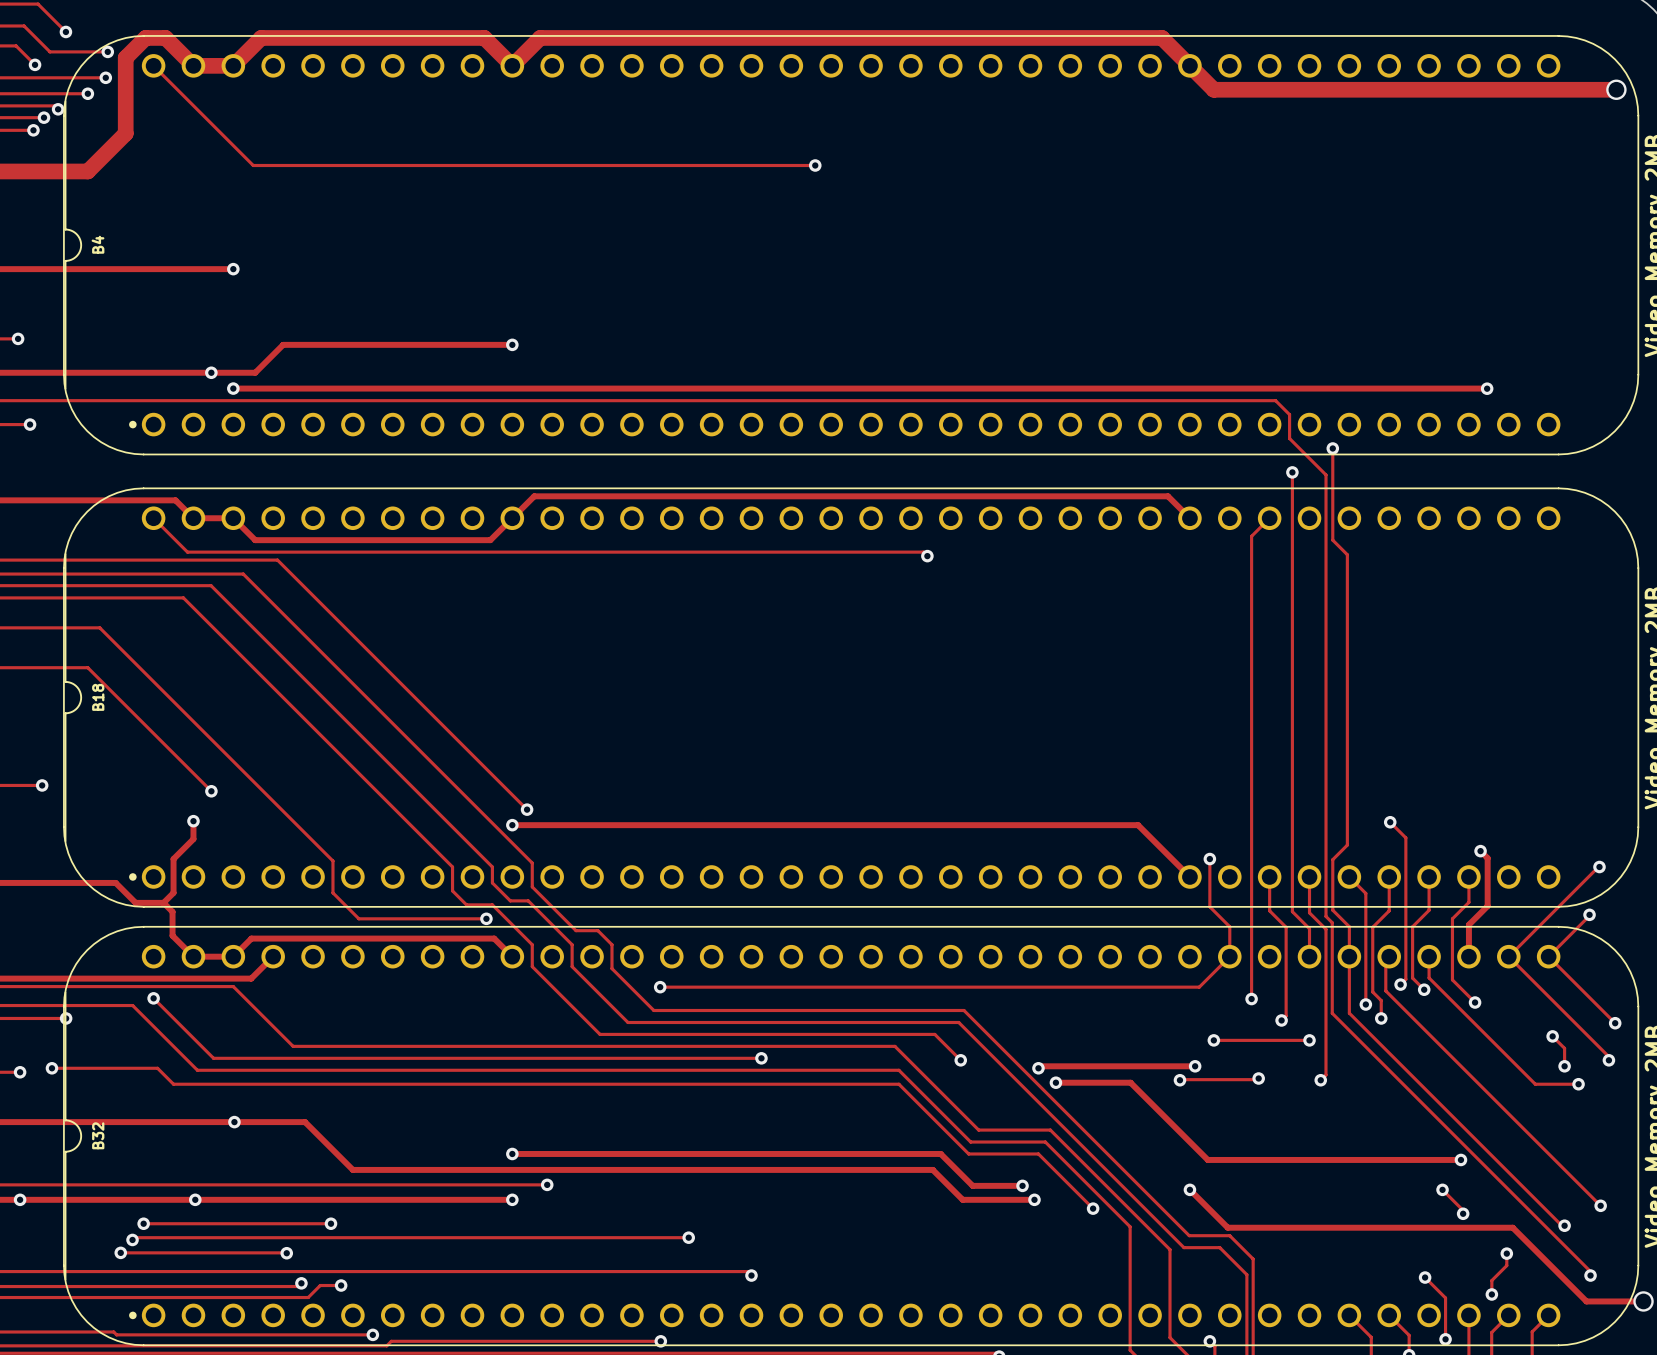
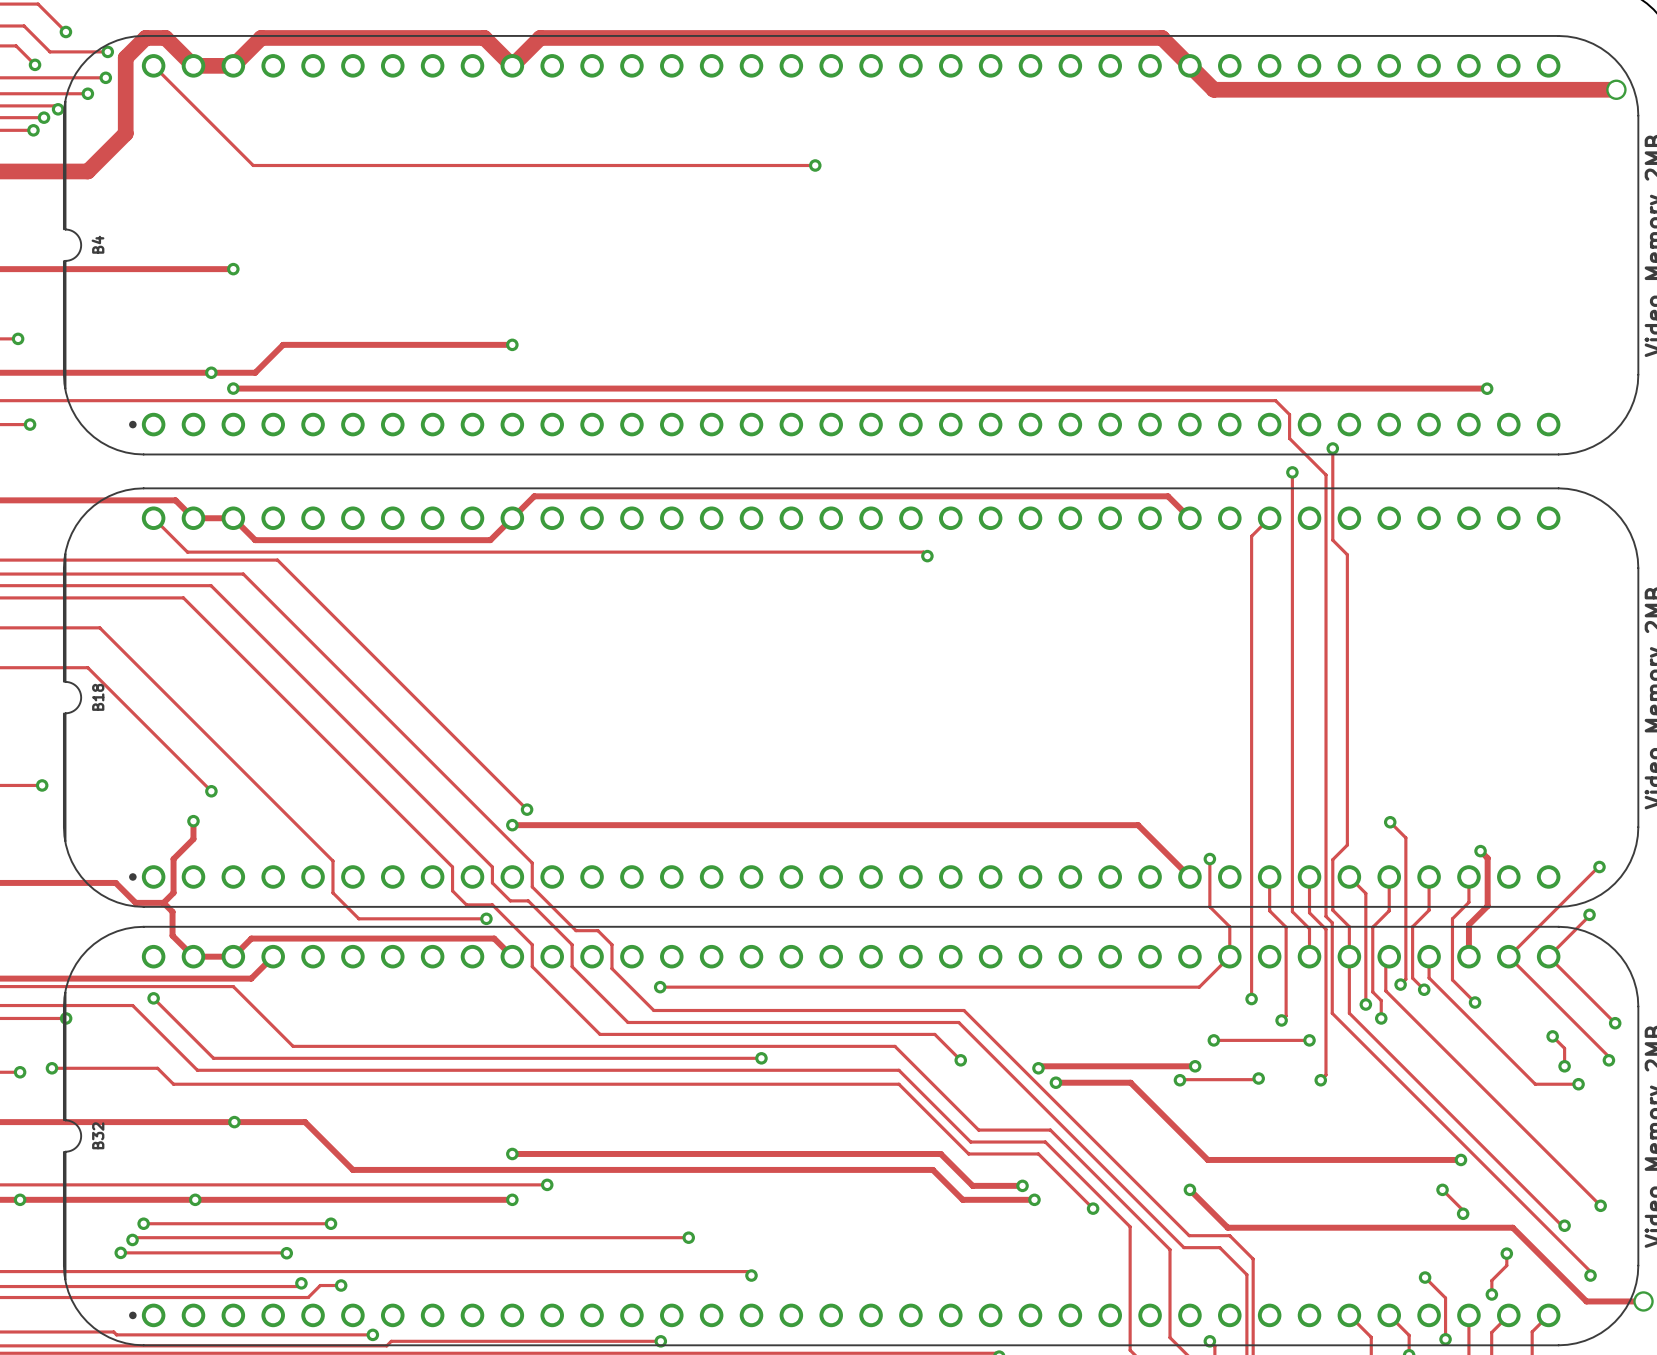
B4 footprint: [63, 35, 1640, 456] -> [63, 35, 1640, 456]
B18 footprint: [63, 487, 1640, 908] -> [63, 487, 1640, 908]
B32 footprint: [63, 926, 1640, 1347] -> [63, 926, 1640, 1347]

